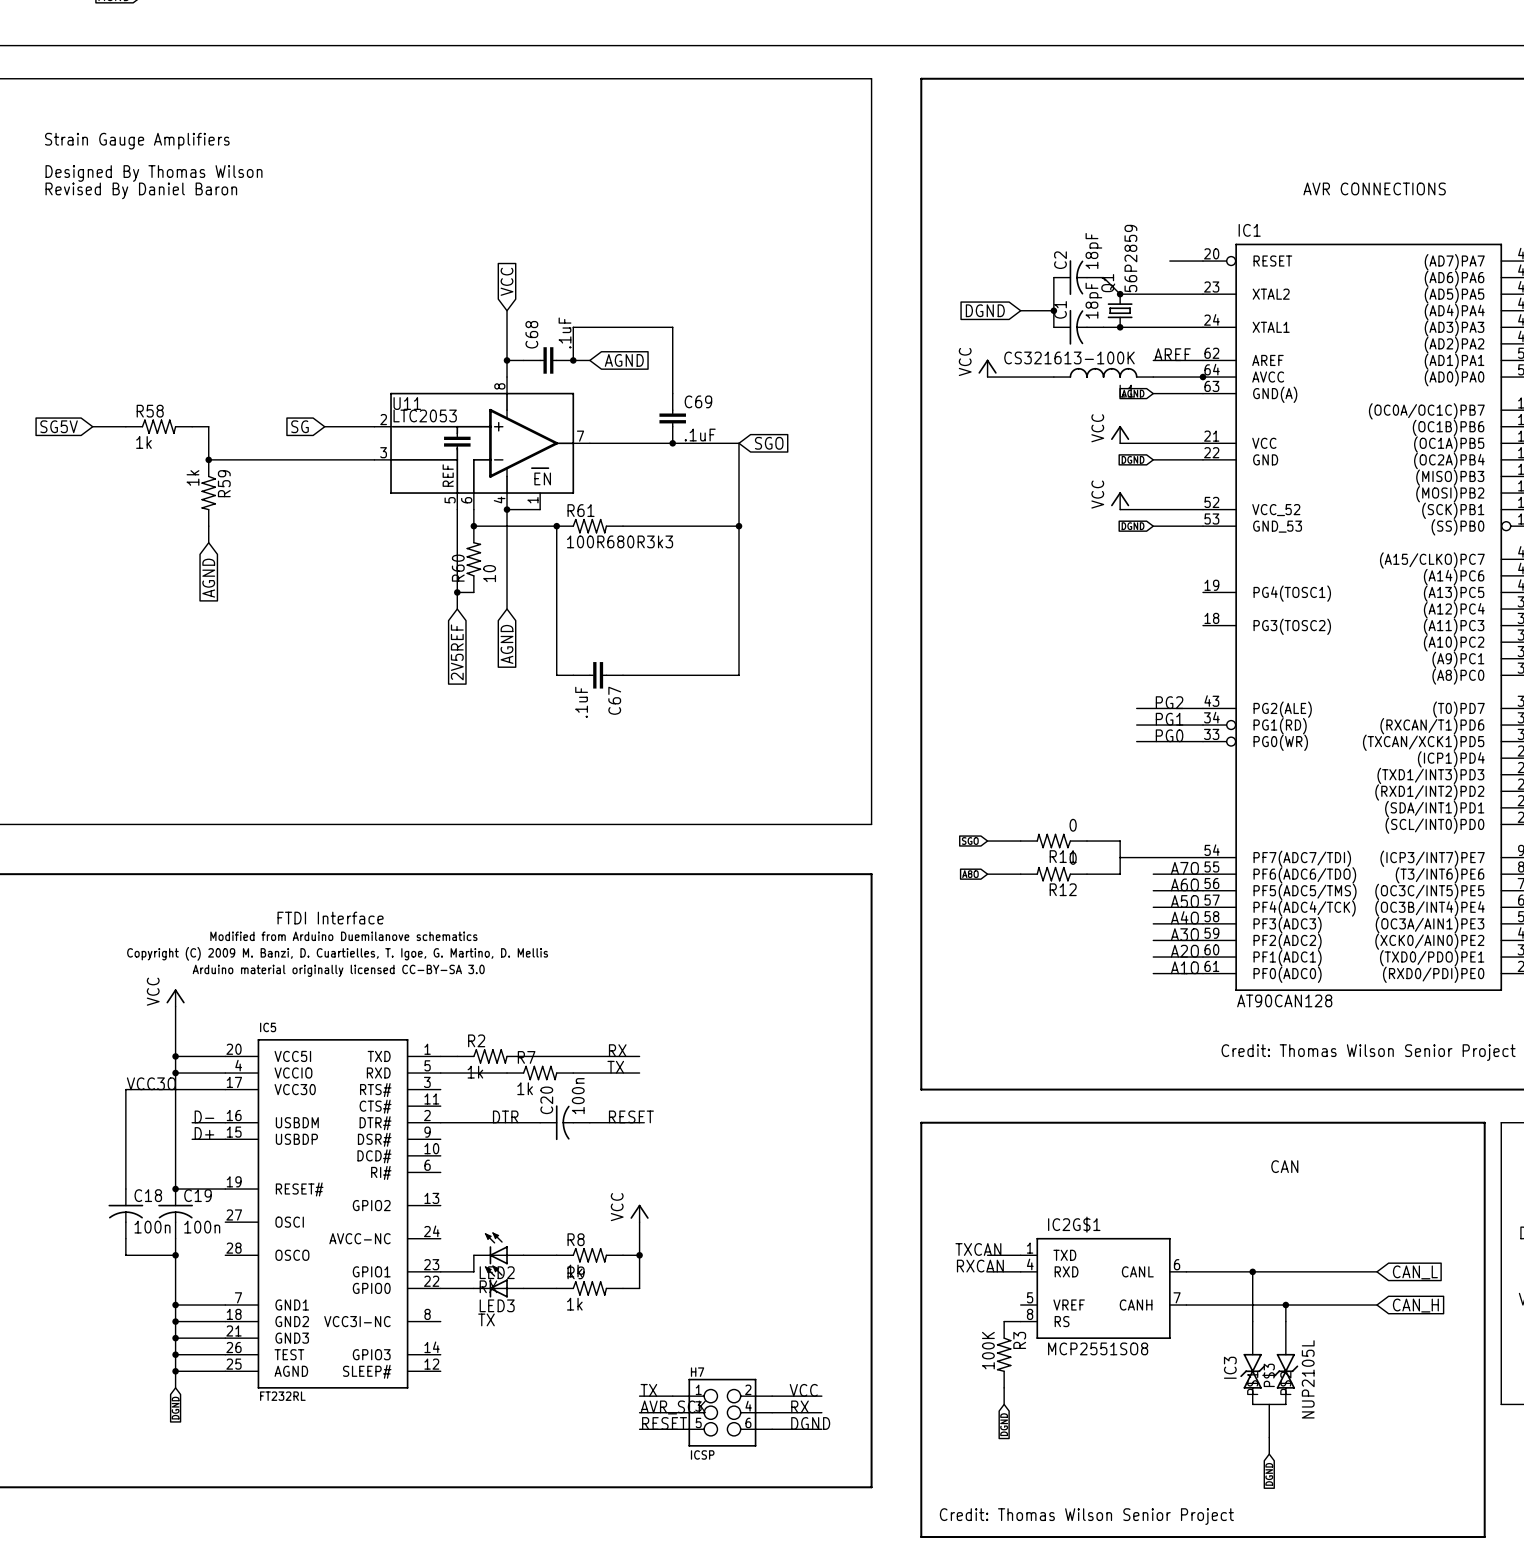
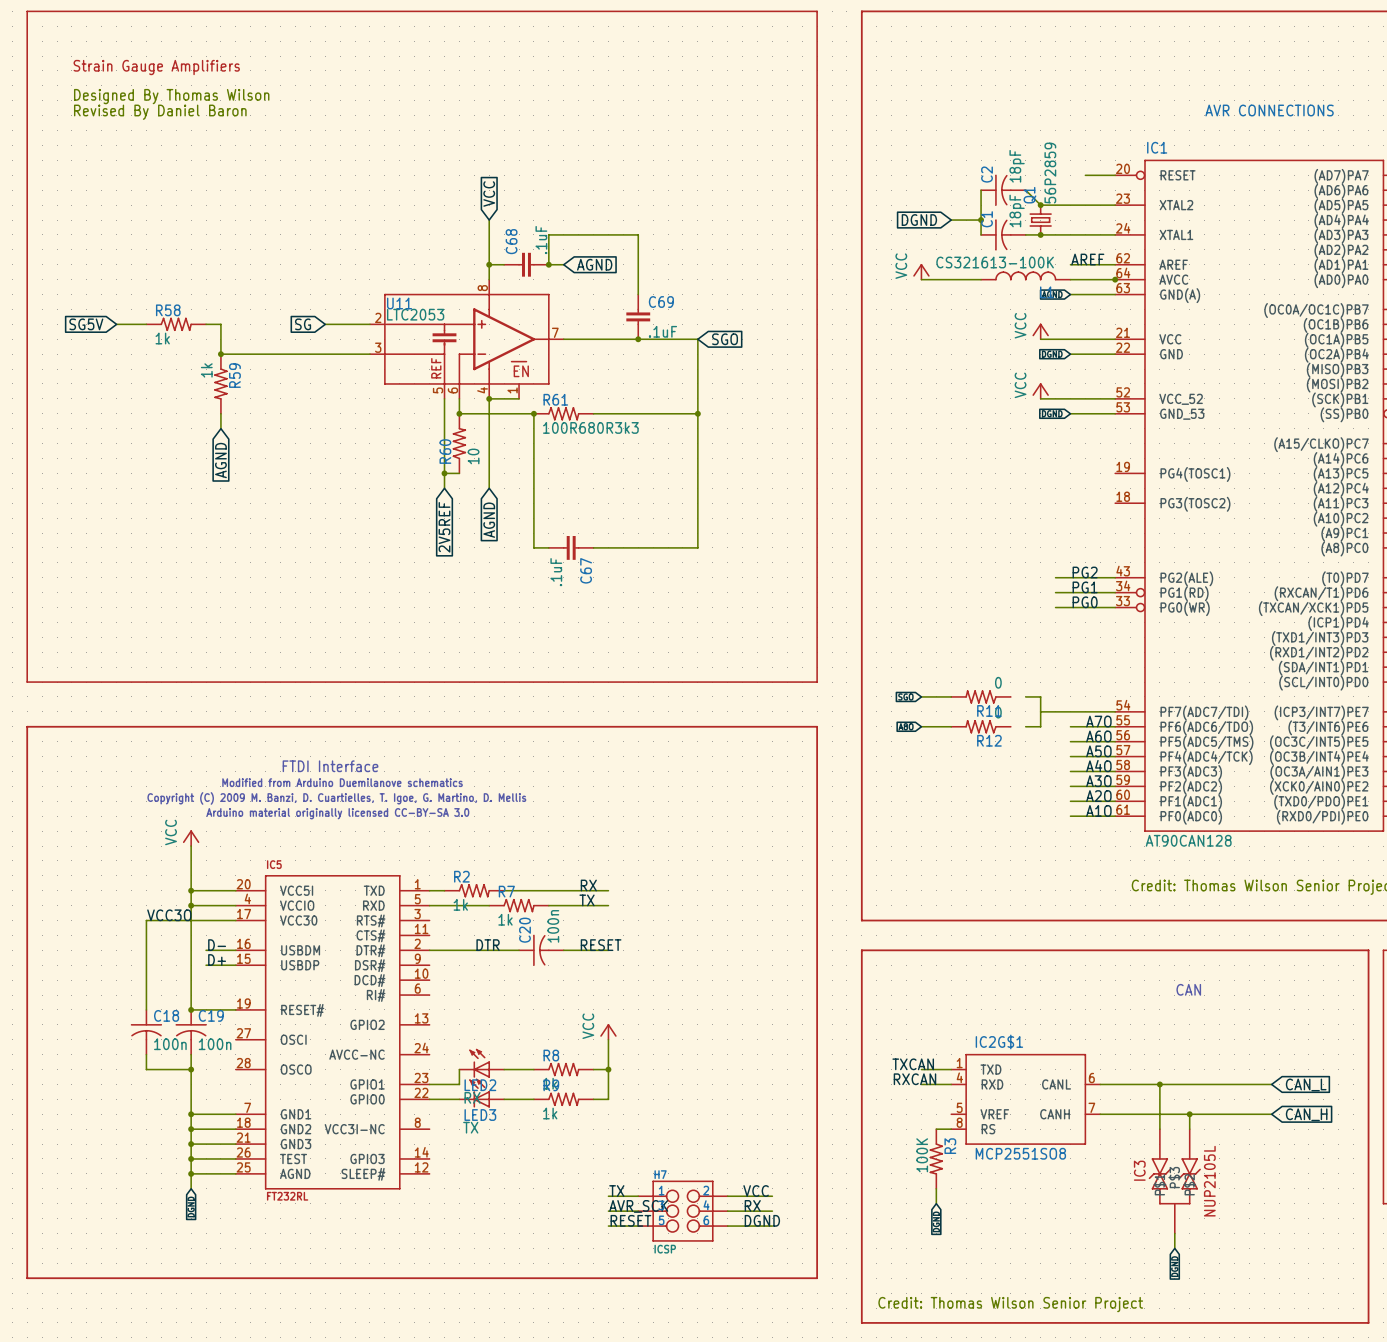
wire: (1086, 841) (1103, 841) -> none
wire: (1086, 874) (1103, 874) -> none

